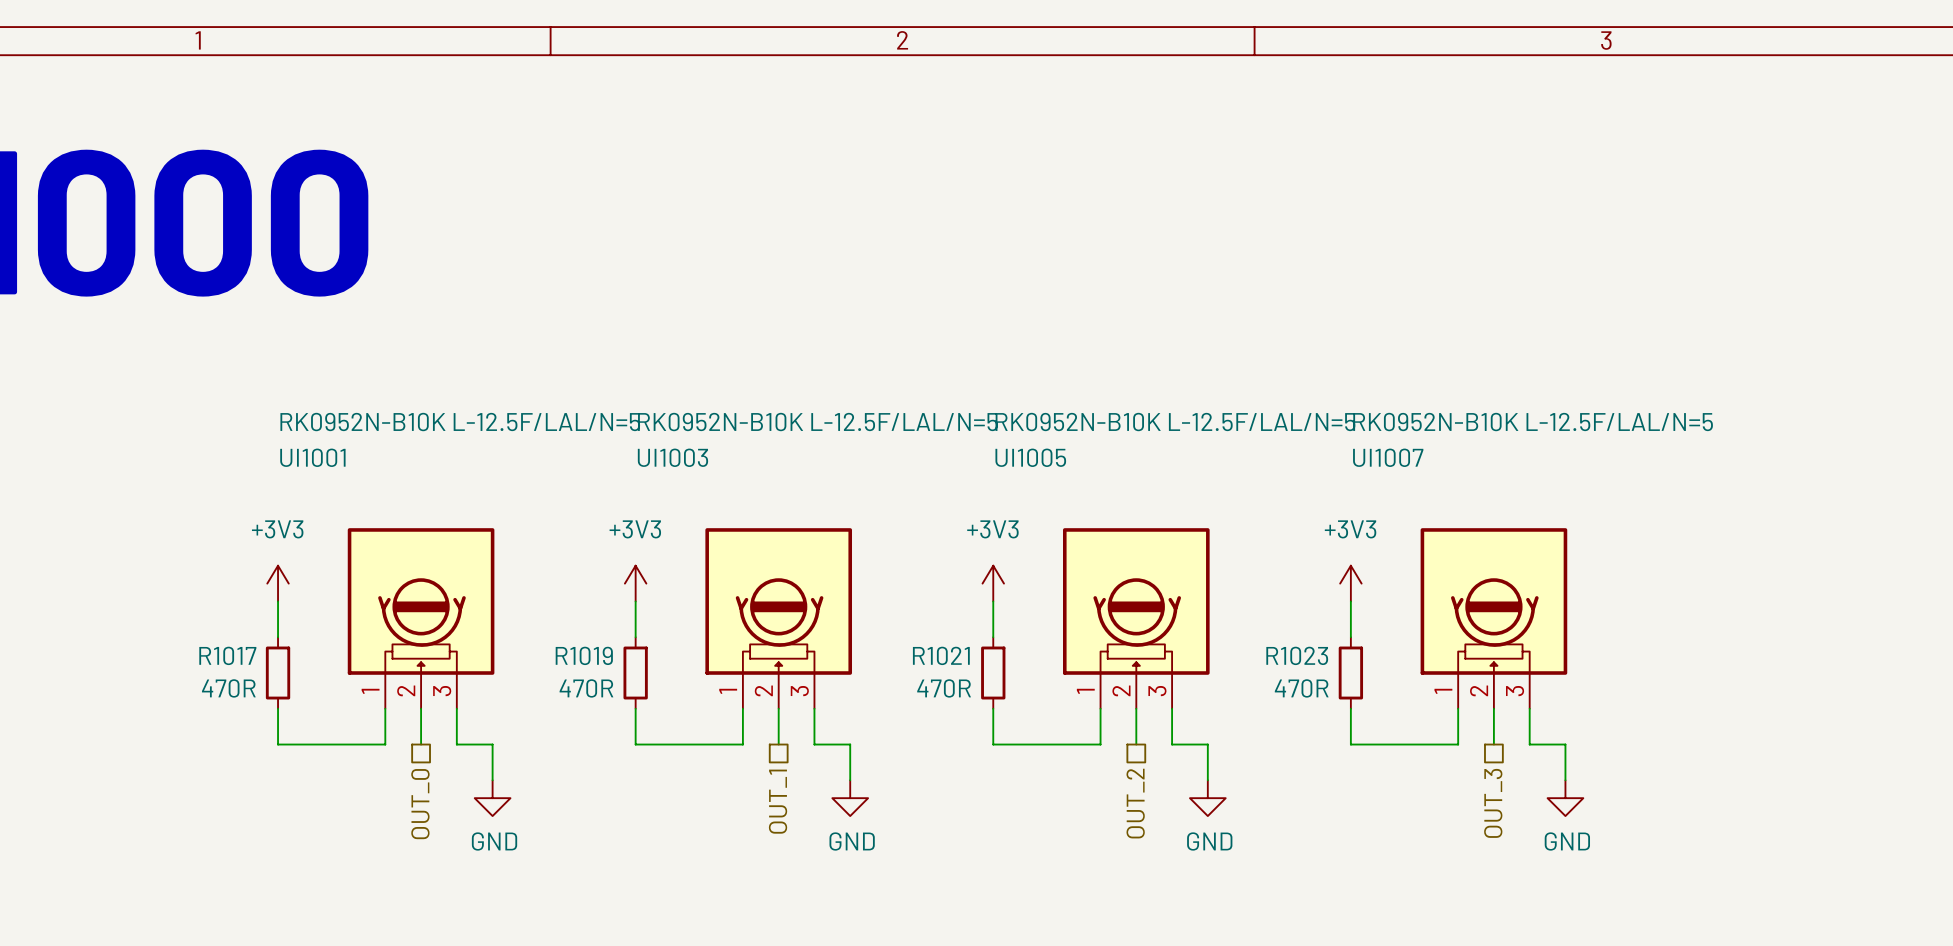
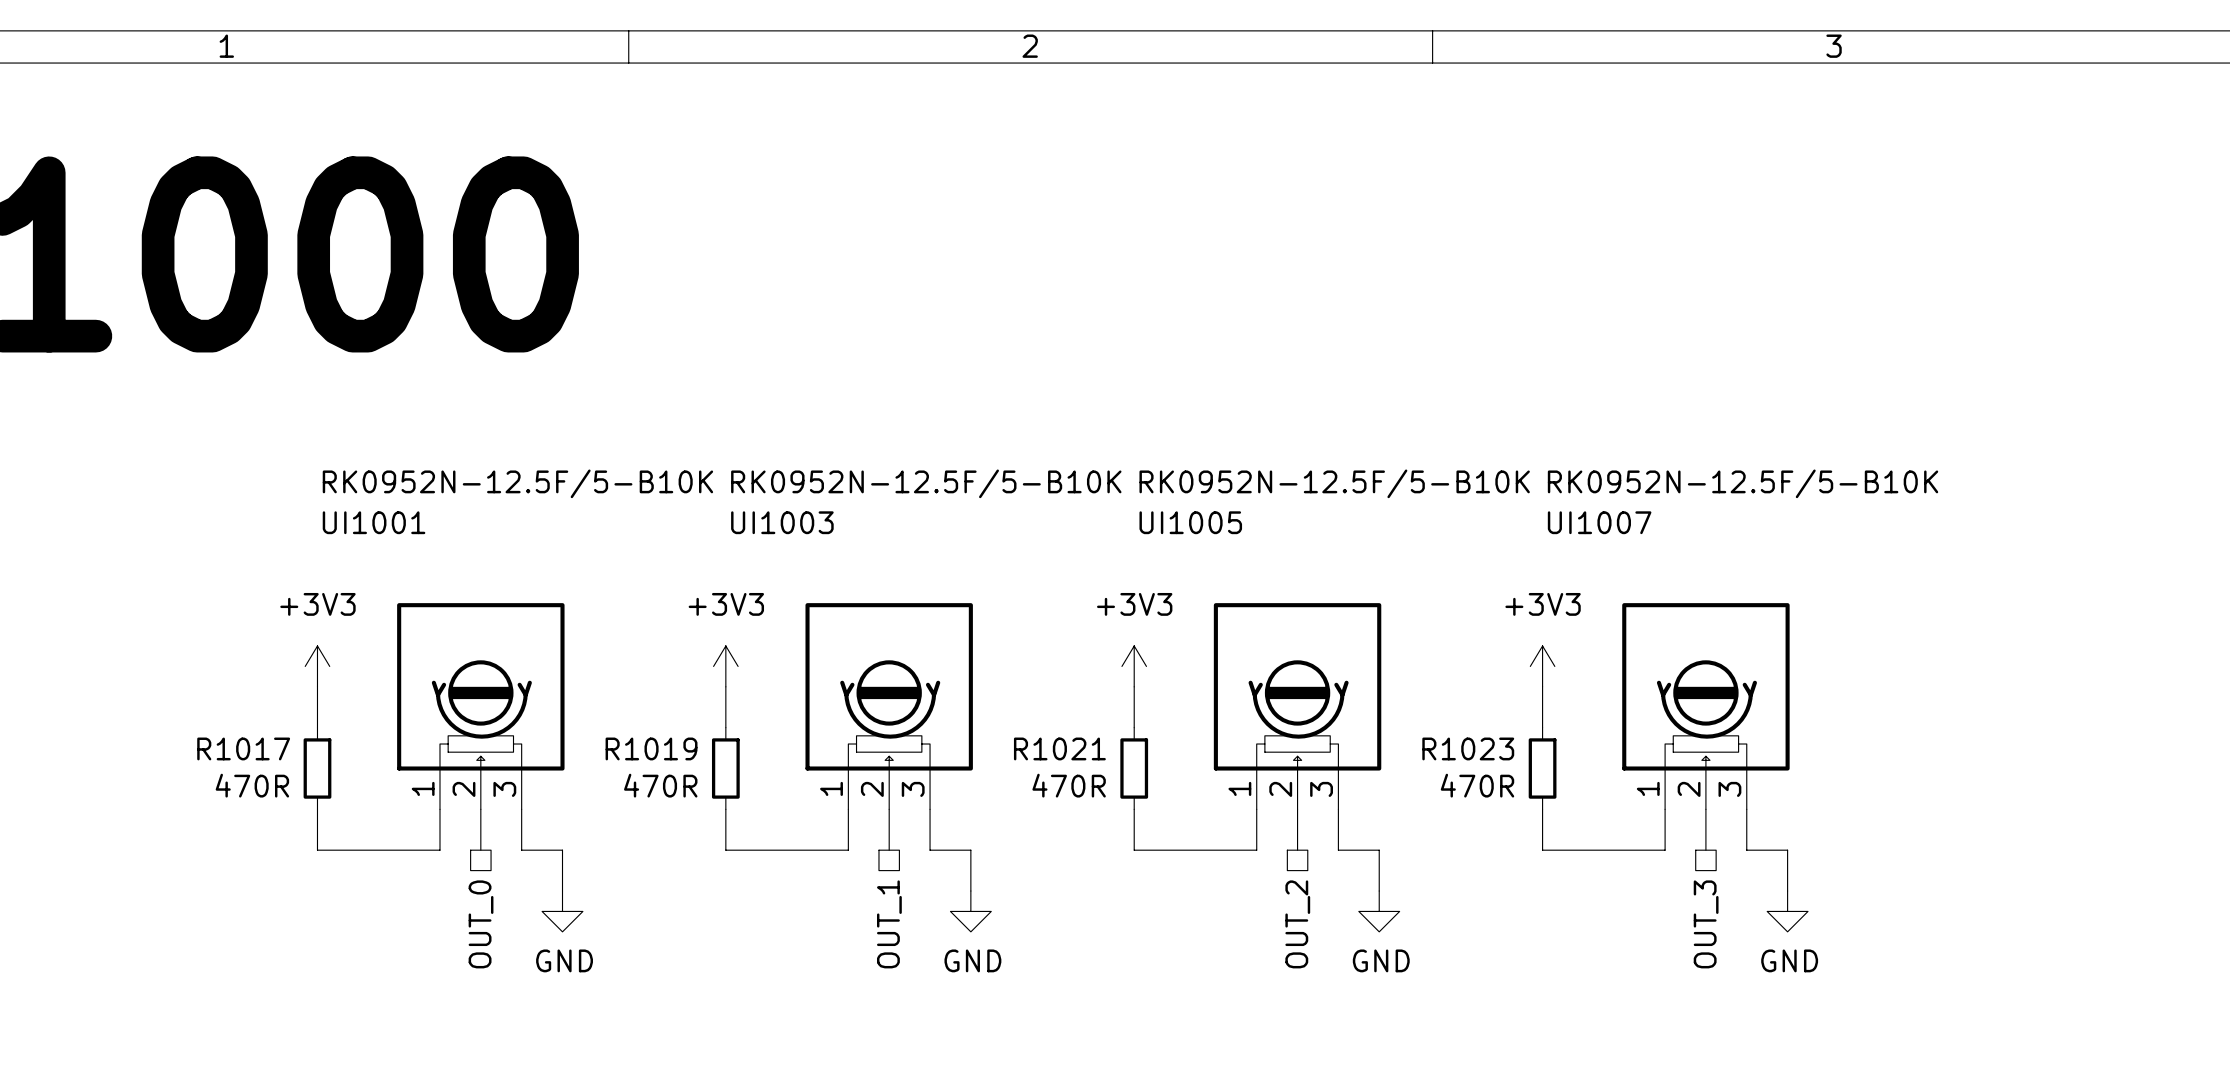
UI1001 value: RK0952N-B10K L-12.5F/LAL/N=5 (460, 422) -> RK0952N-12.5F/5-B10K (517, 483)
UI1003 value: RK0952N-B10K L-12.5F/LAL/N=5 (817, 422) -> RK0952N-12.5F/5-B10K (926, 483)
UI1005 value: RK0952N-B10K L-12.5F/LAL/N=5 (1175, 422) -> RK0952N-12.5F/5-B10K (1334, 483)
UI1007 value: RK0952N-B10K L-12.5F/LAL/N=5 (1533, 422) -> RK0952N-12.5F/5-B10K (1743, 483)

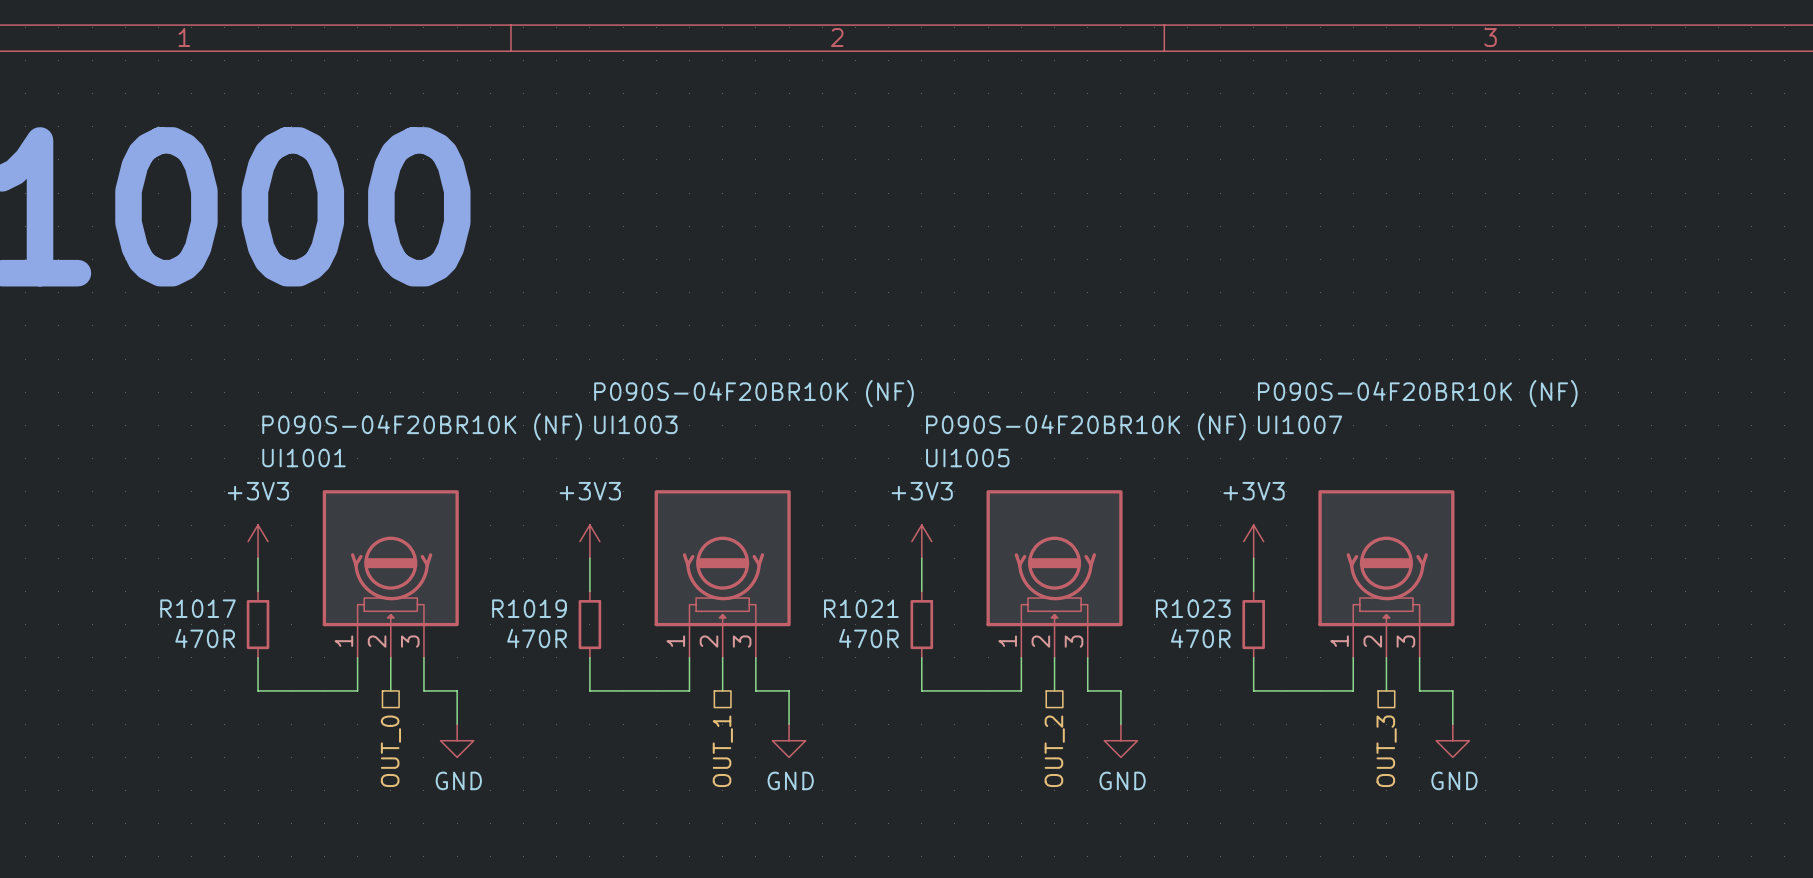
UI1001 value: RK0952N-12.5F/5-B10K (517, 483) -> P090S-04F20BR10K (NF) (422, 426)
UI1003 value: RK0952N-12.5F/5-B10K (926, 483) -> P090S-04F20BR10K (NF) (754, 393)
UI1005 value: RK0952N-12.5F/5-B10K (1334, 483) -> P090S-04F20BR10K (NF) (1085, 426)
UI1007 value: RK0952N-12.5F/5-B10K (1743, 483) -> P090S-04F20BR10K (NF) (1417, 393)
UI1001 name position: UI1001 (374, 522) -> UI1001 (303, 458)
UI1005 name position: UI1005 (1190, 522) -> UI1005 (967, 458)

